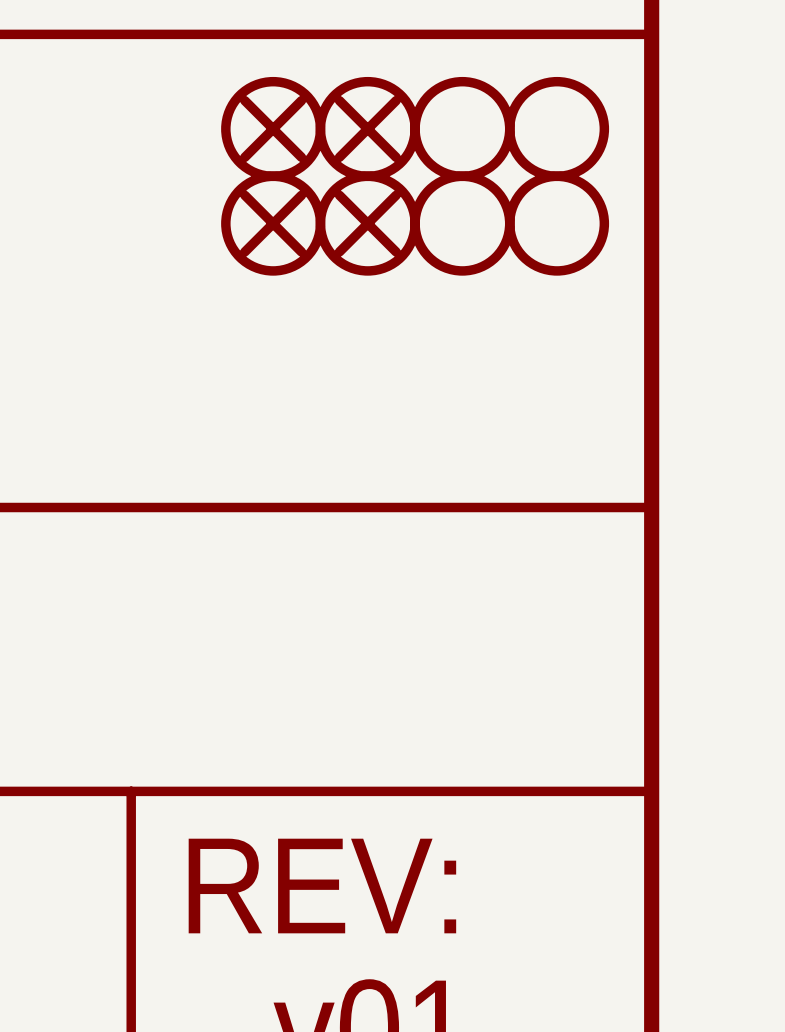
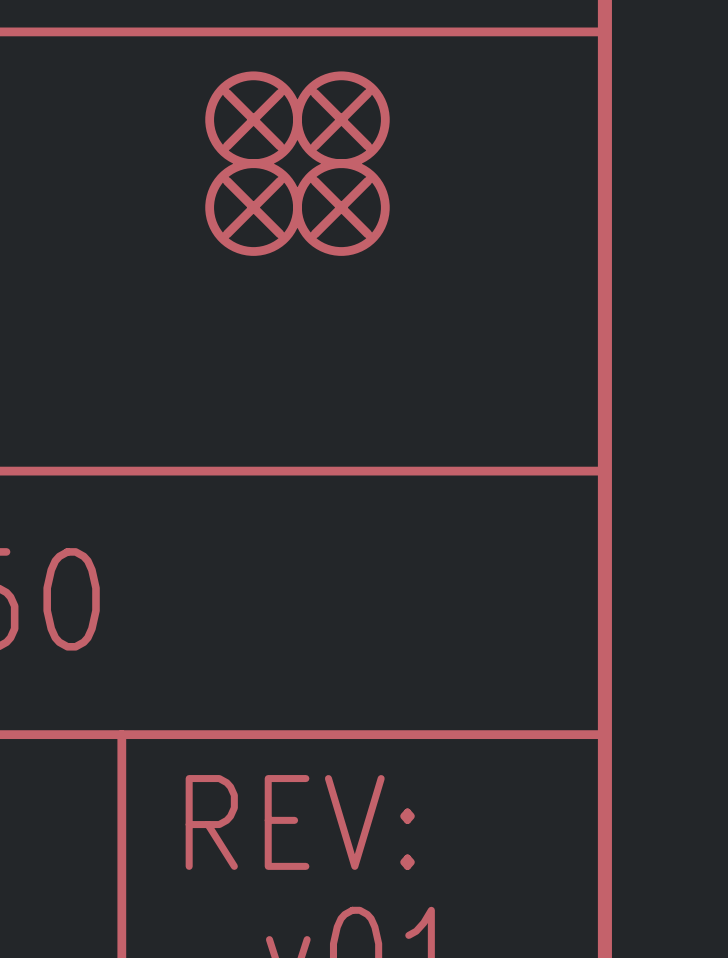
part: (462, 128) -> none
part: (557, 128) -> none
part: (462, 223) -> none
part: (557, 223) -> none

